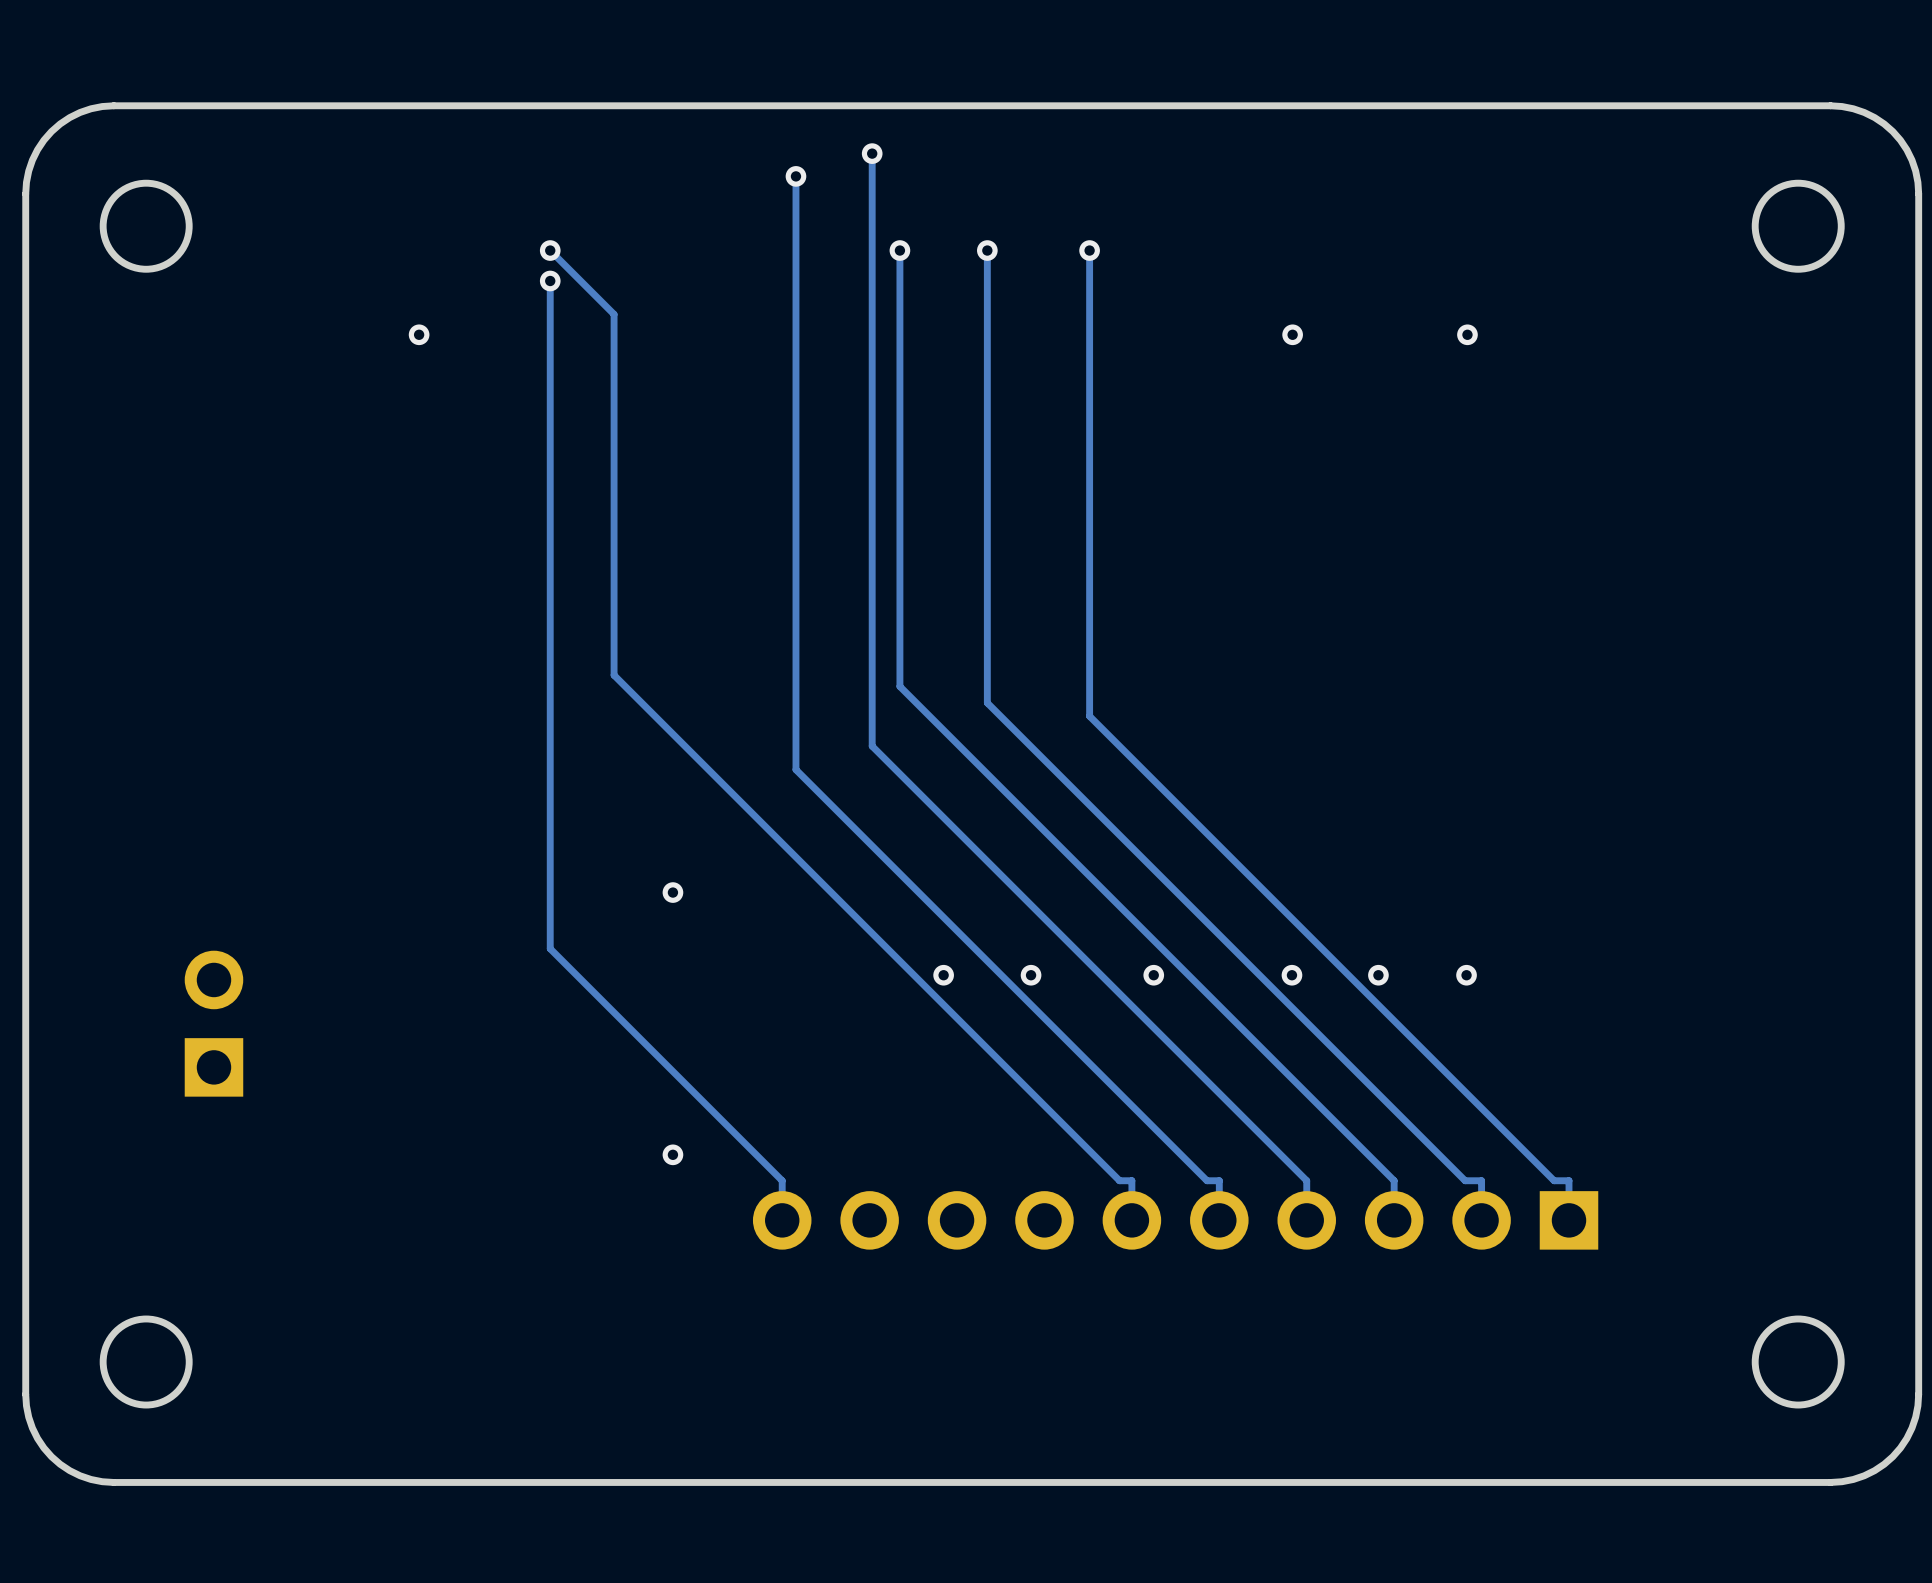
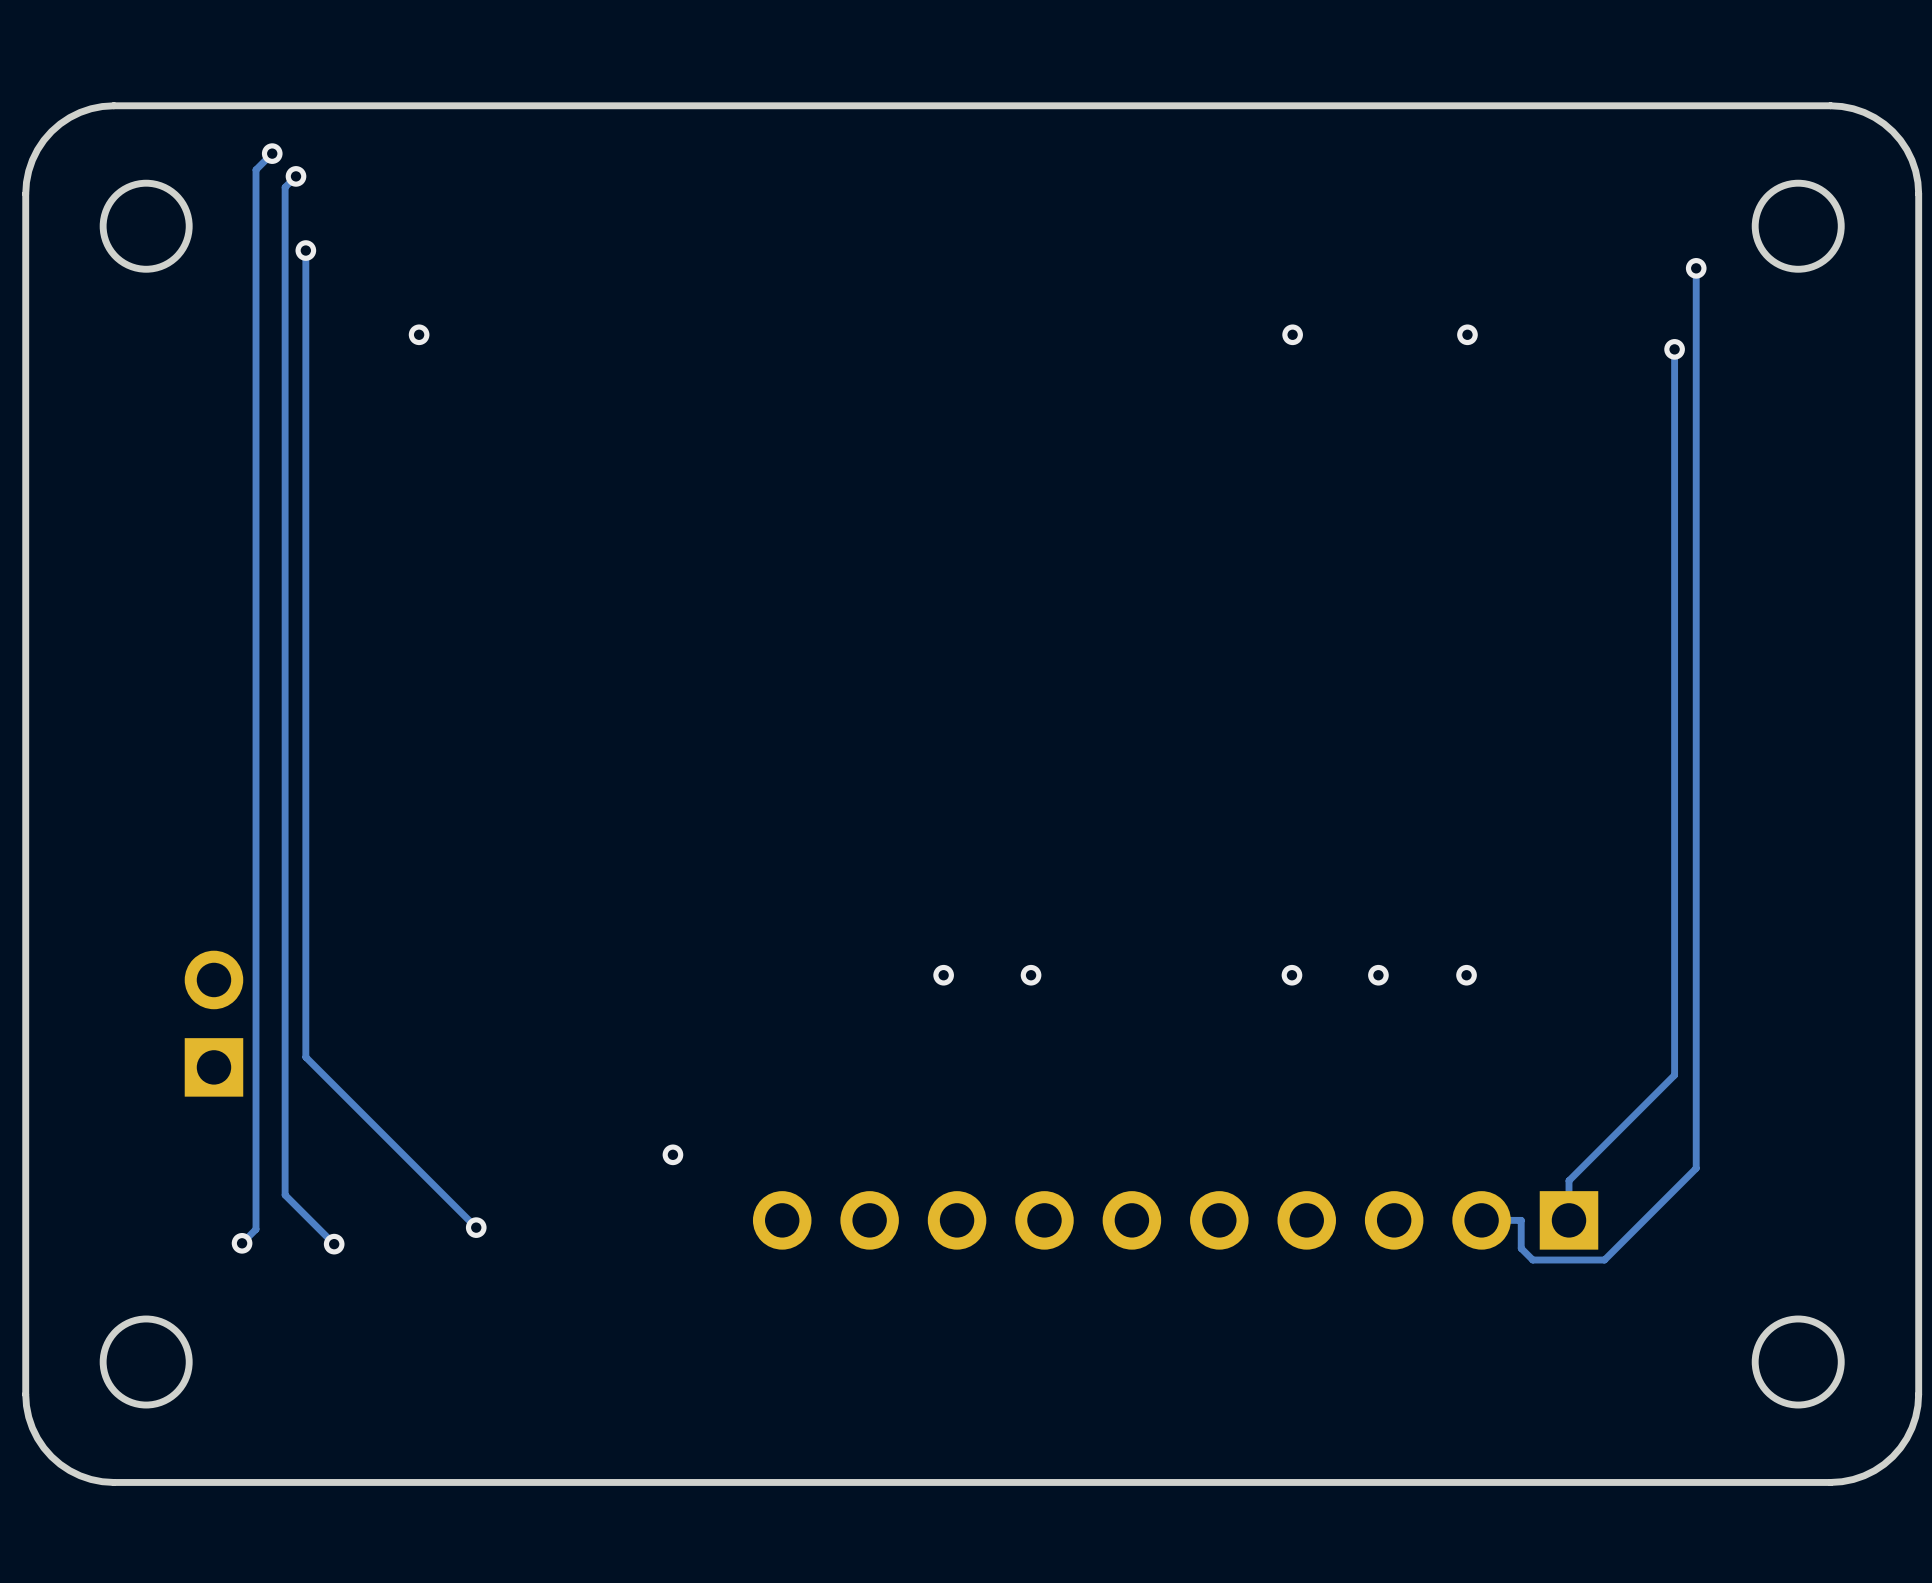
track: none -> (272, 153) (256, 169) (256, 1229) (242, 1243)
via: none -> (272, 153)
track: (872, 153) (872, 746) (1306, 1180) (1306, 1220) -> none
via: (872, 153) -> none
track: none -> (296, 176) (285, 187) (285, 1195) (334, 1244)
via: none -> (296, 176)
track: (795, 176) (795, 769) (1206, 1180) (1219, 1180) (1219, 1220) -> none
via: (795, 176) -> none
track: none -> (305, 250) (305, 1057) (476, 1227)
via: none -> (305, 250)
track: (550, 250) (614, 314) (614, 675) (1119, 1180) (1131, 1180) (1131, 1220) -> none
via: (550, 250) -> none
track: (899, 250) (899, 686) (1394, 1180) (1394, 1220) -> none
via: (899, 250) -> none
track: (987, 250) (987, 702) (1465, 1180) (1481, 1180) (1481, 1220) -> (1696, 268) (1696, 1168) (1604, 1260) (1532, 1260) (1521, 1248) (1521, 1220) (1481, 1220)
via: (987, 250) -> none
track: (1089, 250) (1089, 716) (1554, 1180) (1569, 1180) -> (1674, 349) (1674, 1075) (1569, 1180)
via: (1089, 250) -> none
via: none -> (1696, 268)
track: (550, 280) (550, 948) (782, 1180) (782, 1220) -> none
via: (550, 280) -> none
via: none -> (1674, 349)
via: (672, 892) -> none
via: (1153, 975) -> none
via: none -> (476, 1227)
via: none -> (242, 1243)
via: none -> (334, 1244)

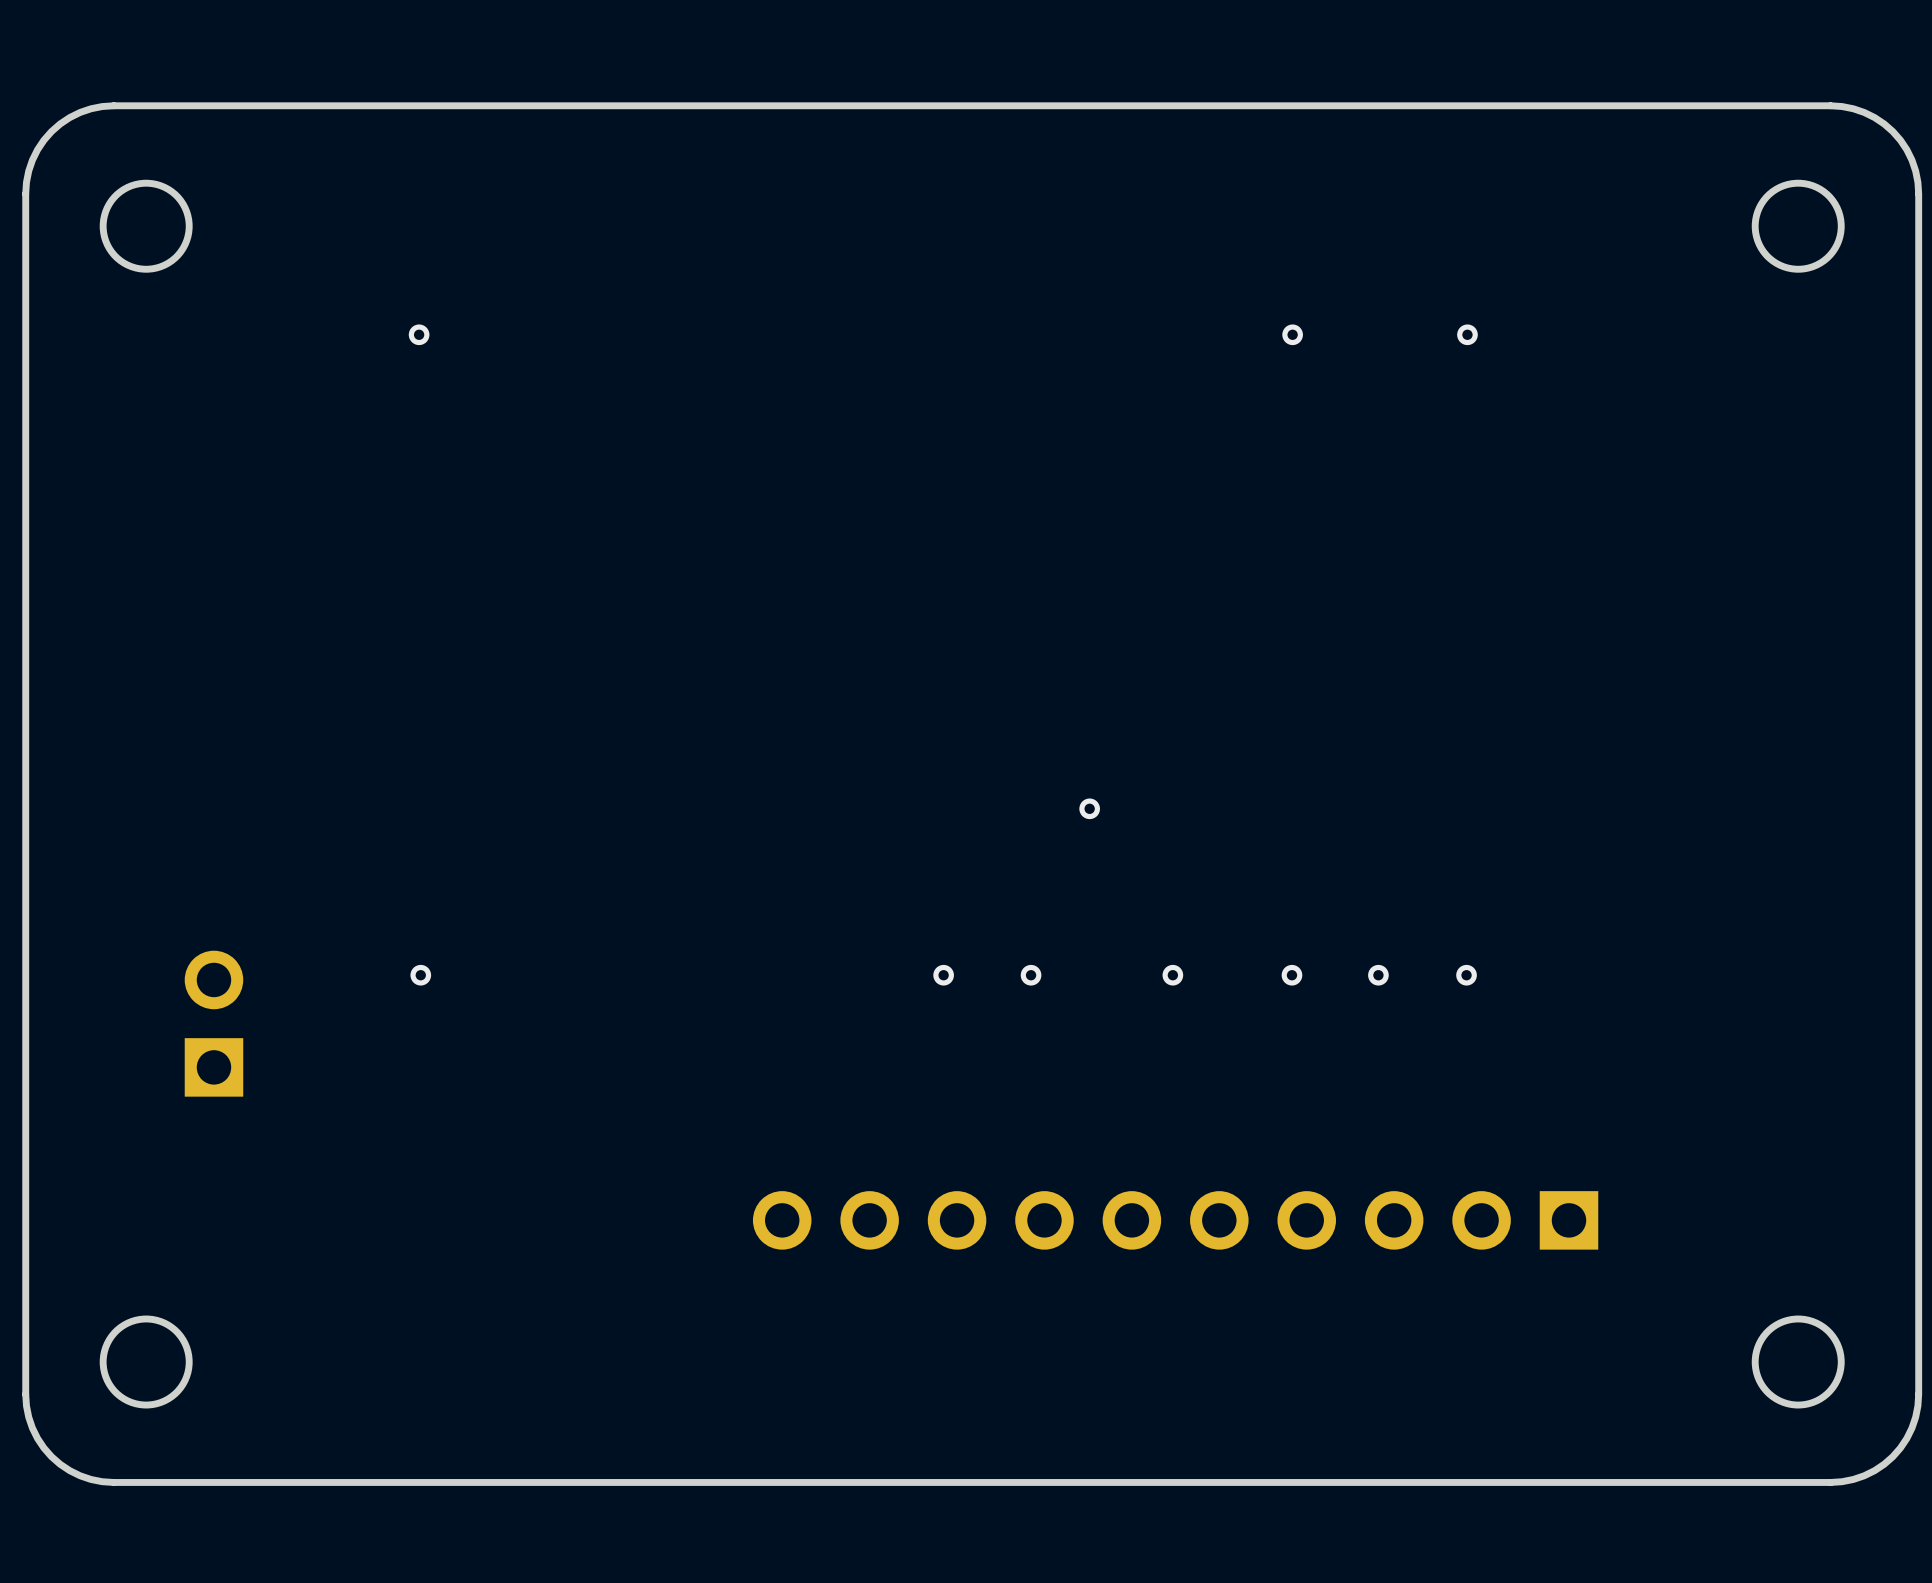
track: (272, 153) (256, 169) (256, 1229) (242, 1243) -> none
via: (272, 153) -> none
track: (296, 176) (285, 187) (285, 1195) (334, 1244) -> none
via: (296, 176) -> none
track: (305, 250) (305, 1057) (476, 1227) -> none
via: (305, 250) -> none
track: (1696, 268) (1696, 1168) (1604, 1260) (1532, 1260) (1521, 1248) (1521, 1220) (1481, 1220) -> none
via: (1696, 268) -> none
track: (1674, 349) (1674, 1075) (1569, 1180) (1569, 1220) -> none
via: (1674, 349) -> none
via: none -> (1089, 808)
via: none -> (420, 975)
via: none -> (1172, 975)
via: (672, 1154) -> none
via: (476, 1227) -> none
via: (242, 1243) -> none
via: (334, 1244) -> none

